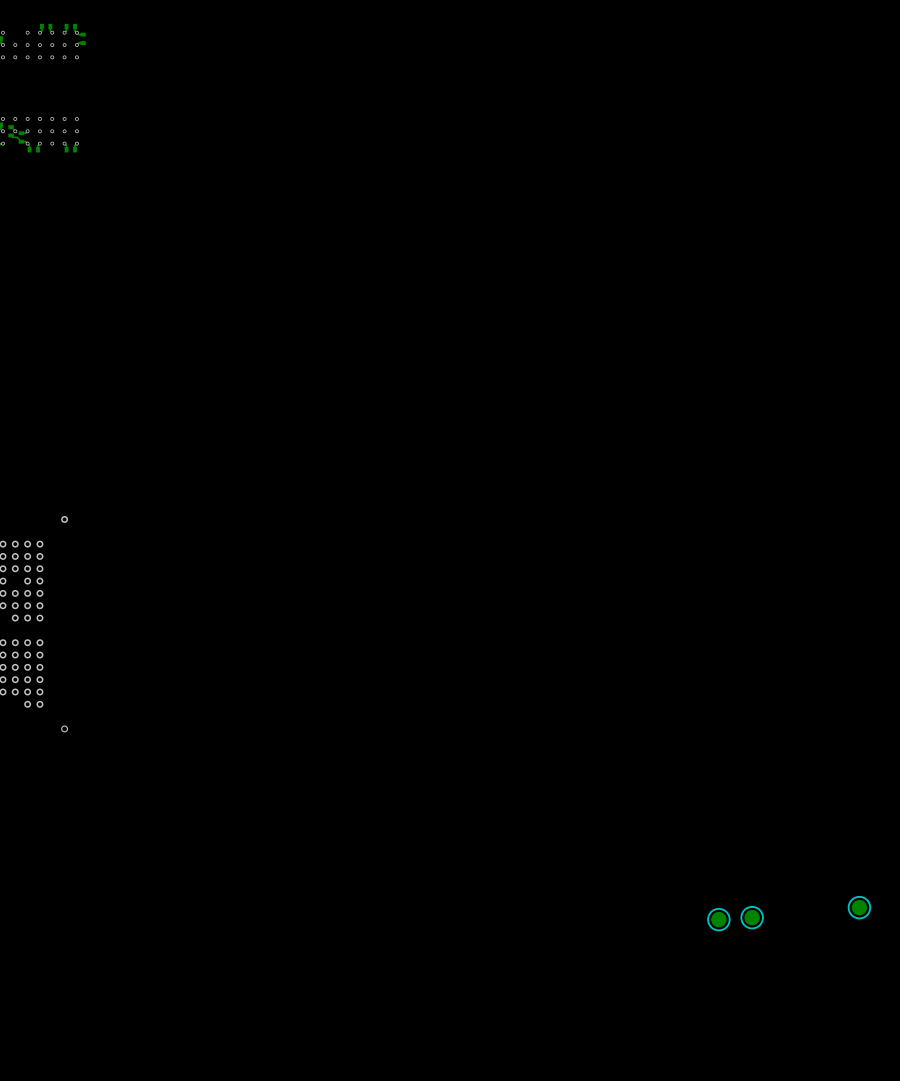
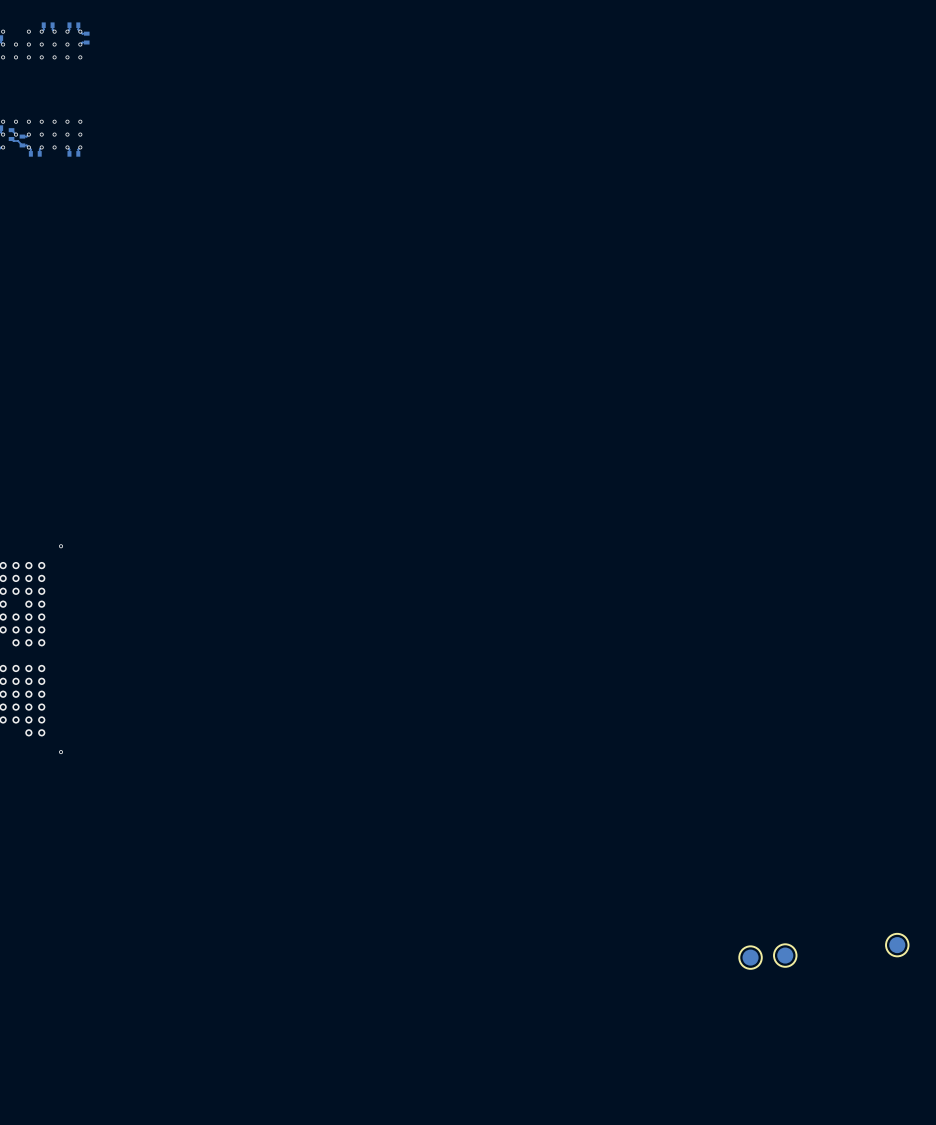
via: (64, 519) -> none
via: none -> (61, 546)
via: none -> (61, 752)
via: (64, 728) -> none

